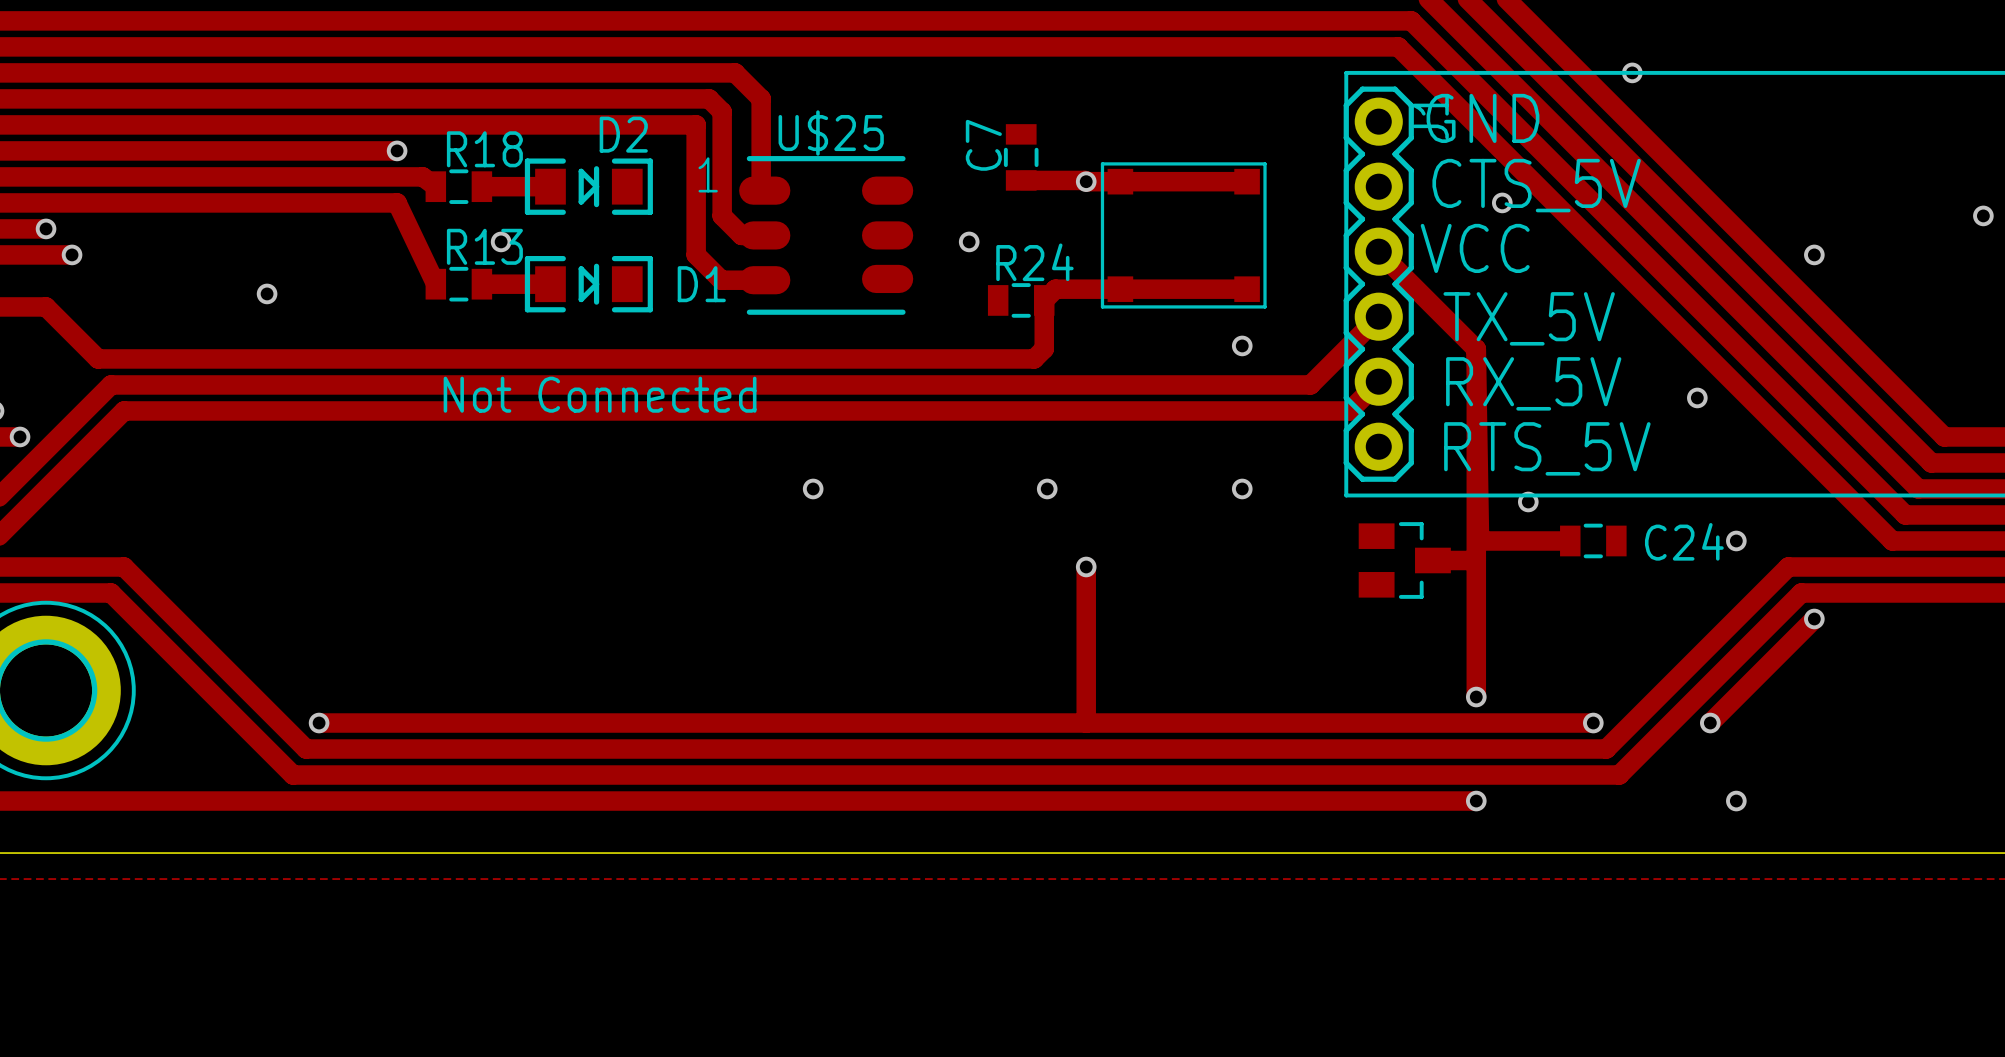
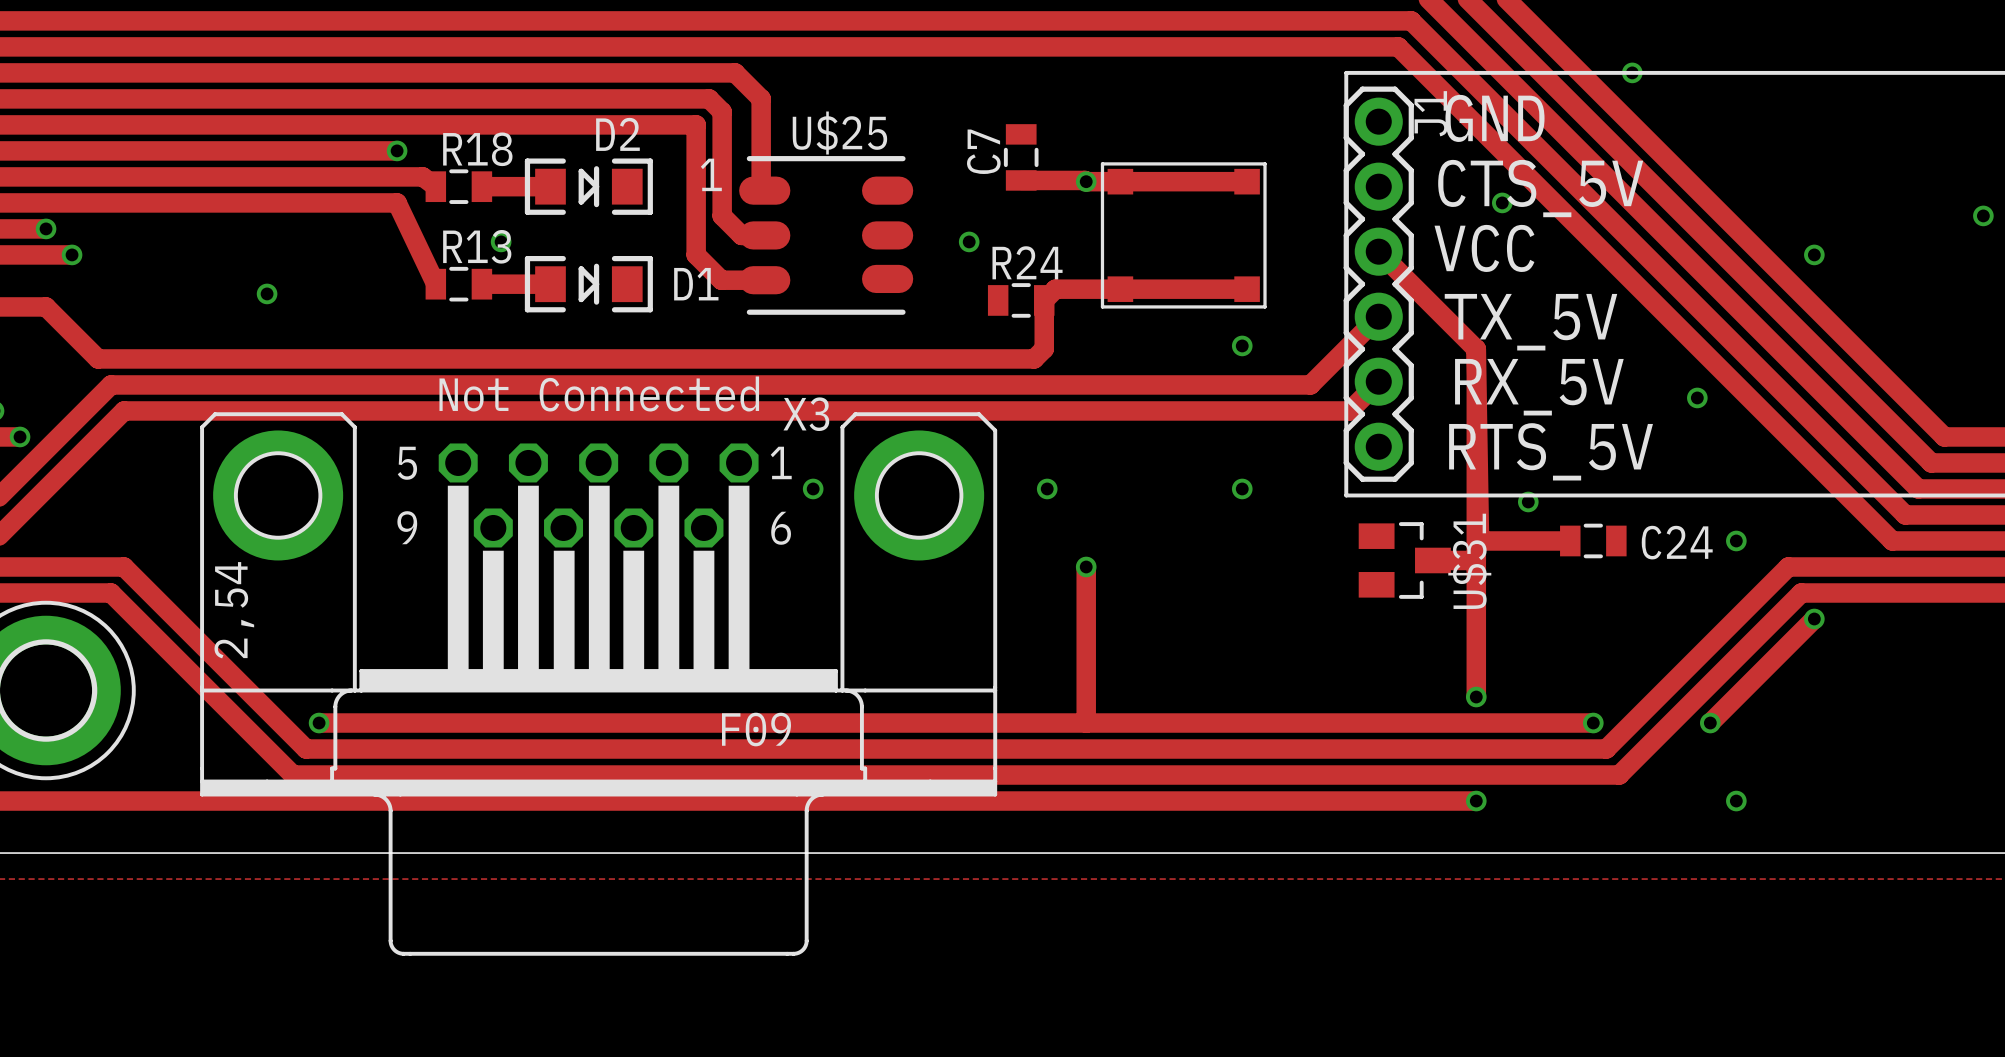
U$31 name: none -> U$31 (1469, 561)
X3: none -> (598, 684)

